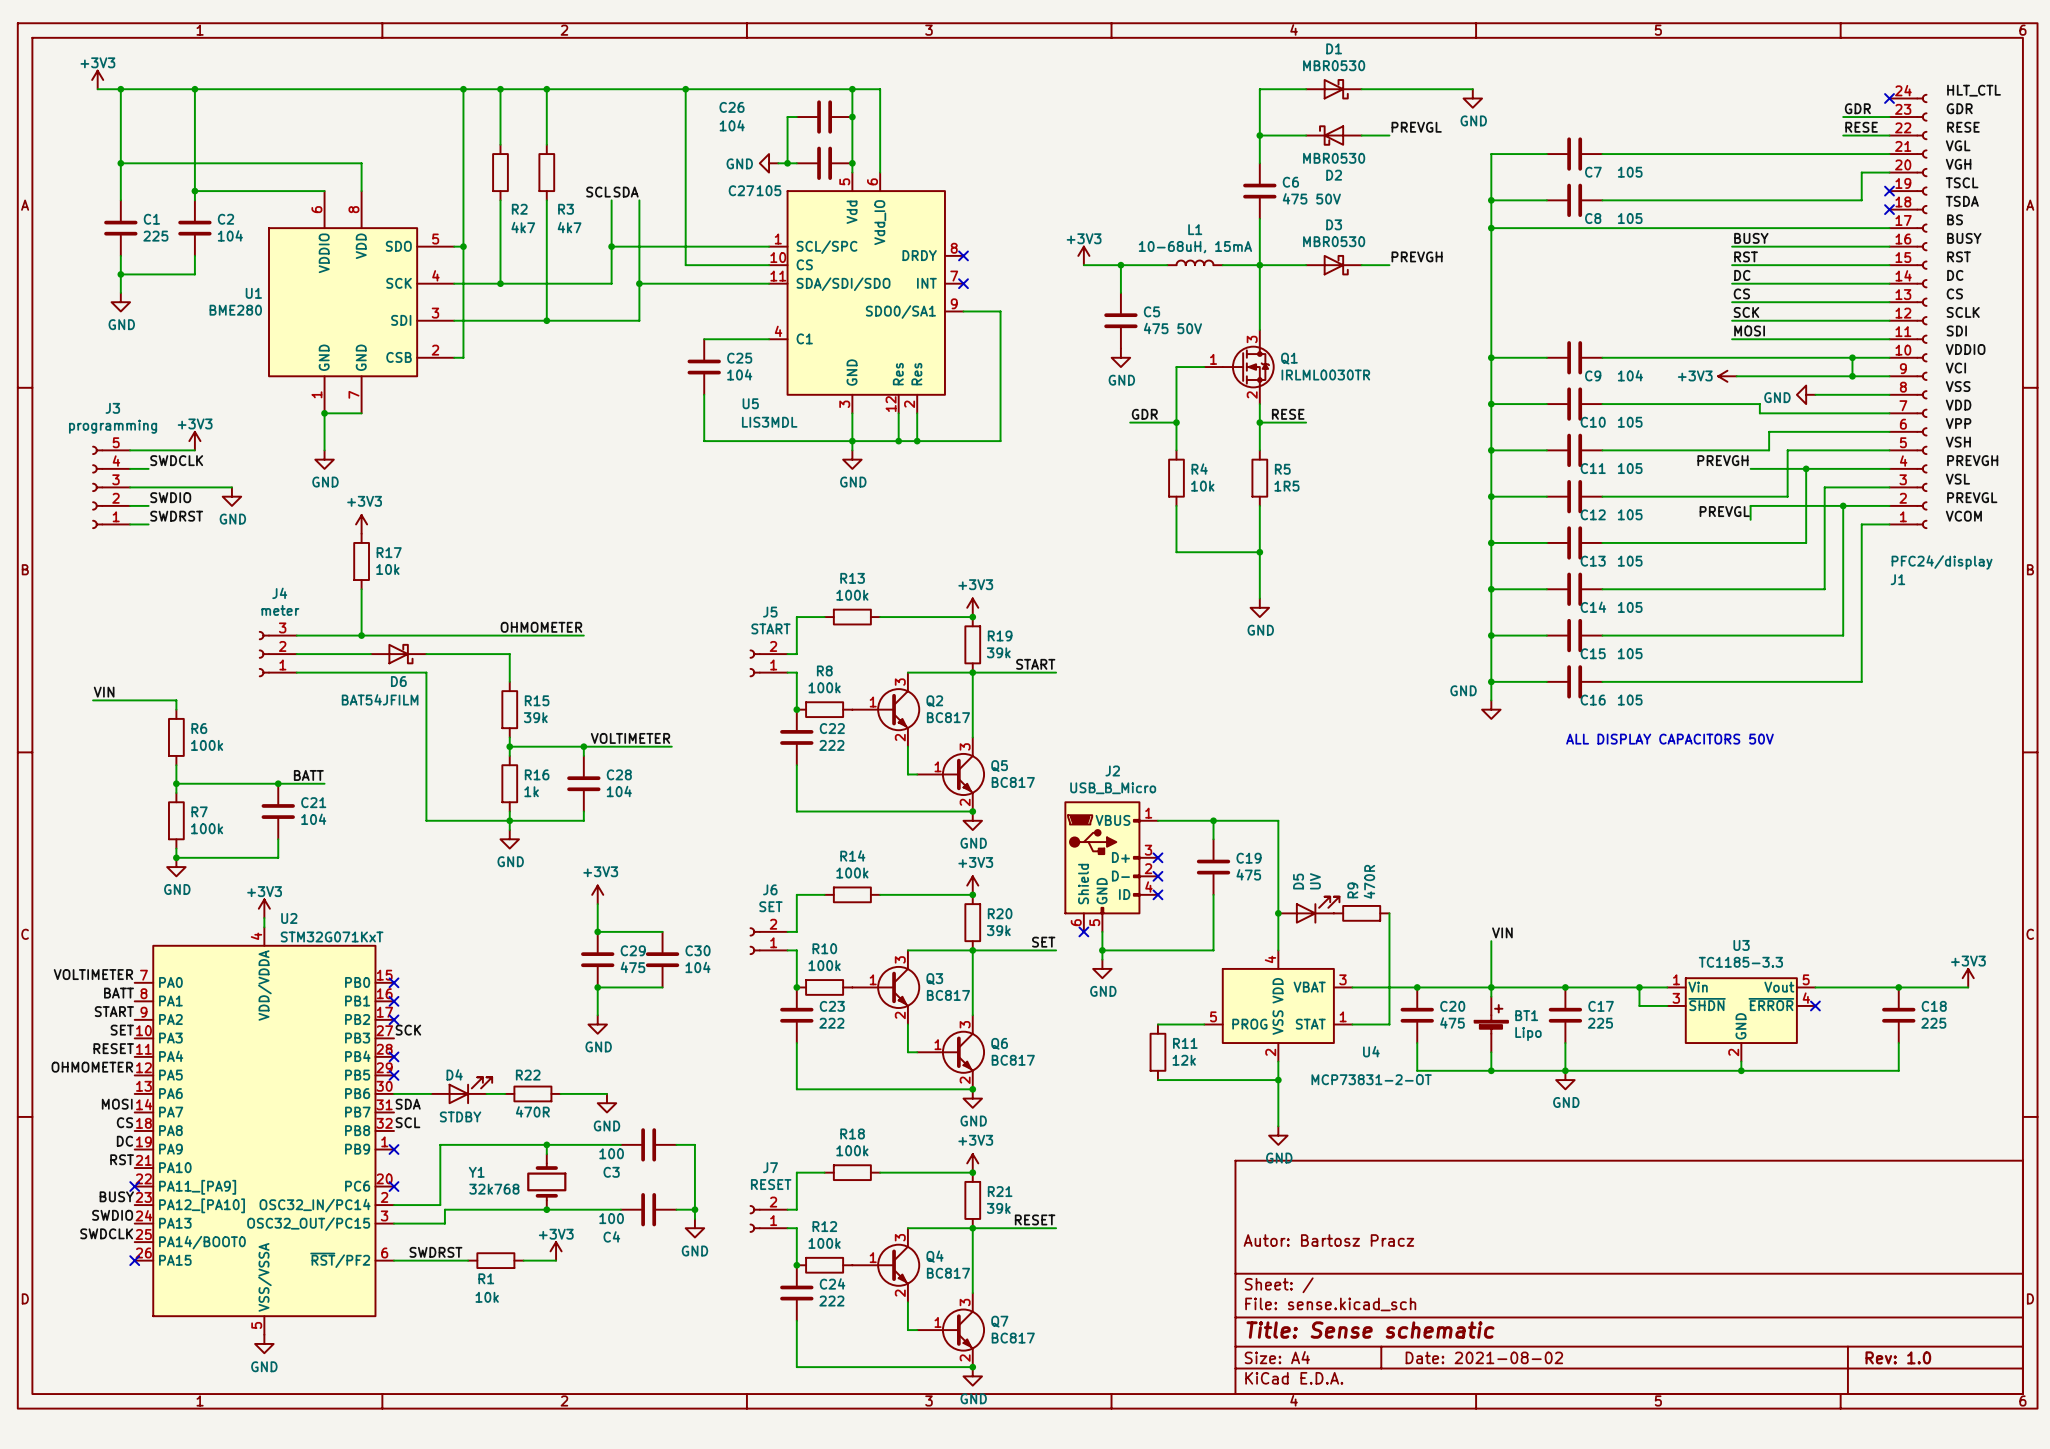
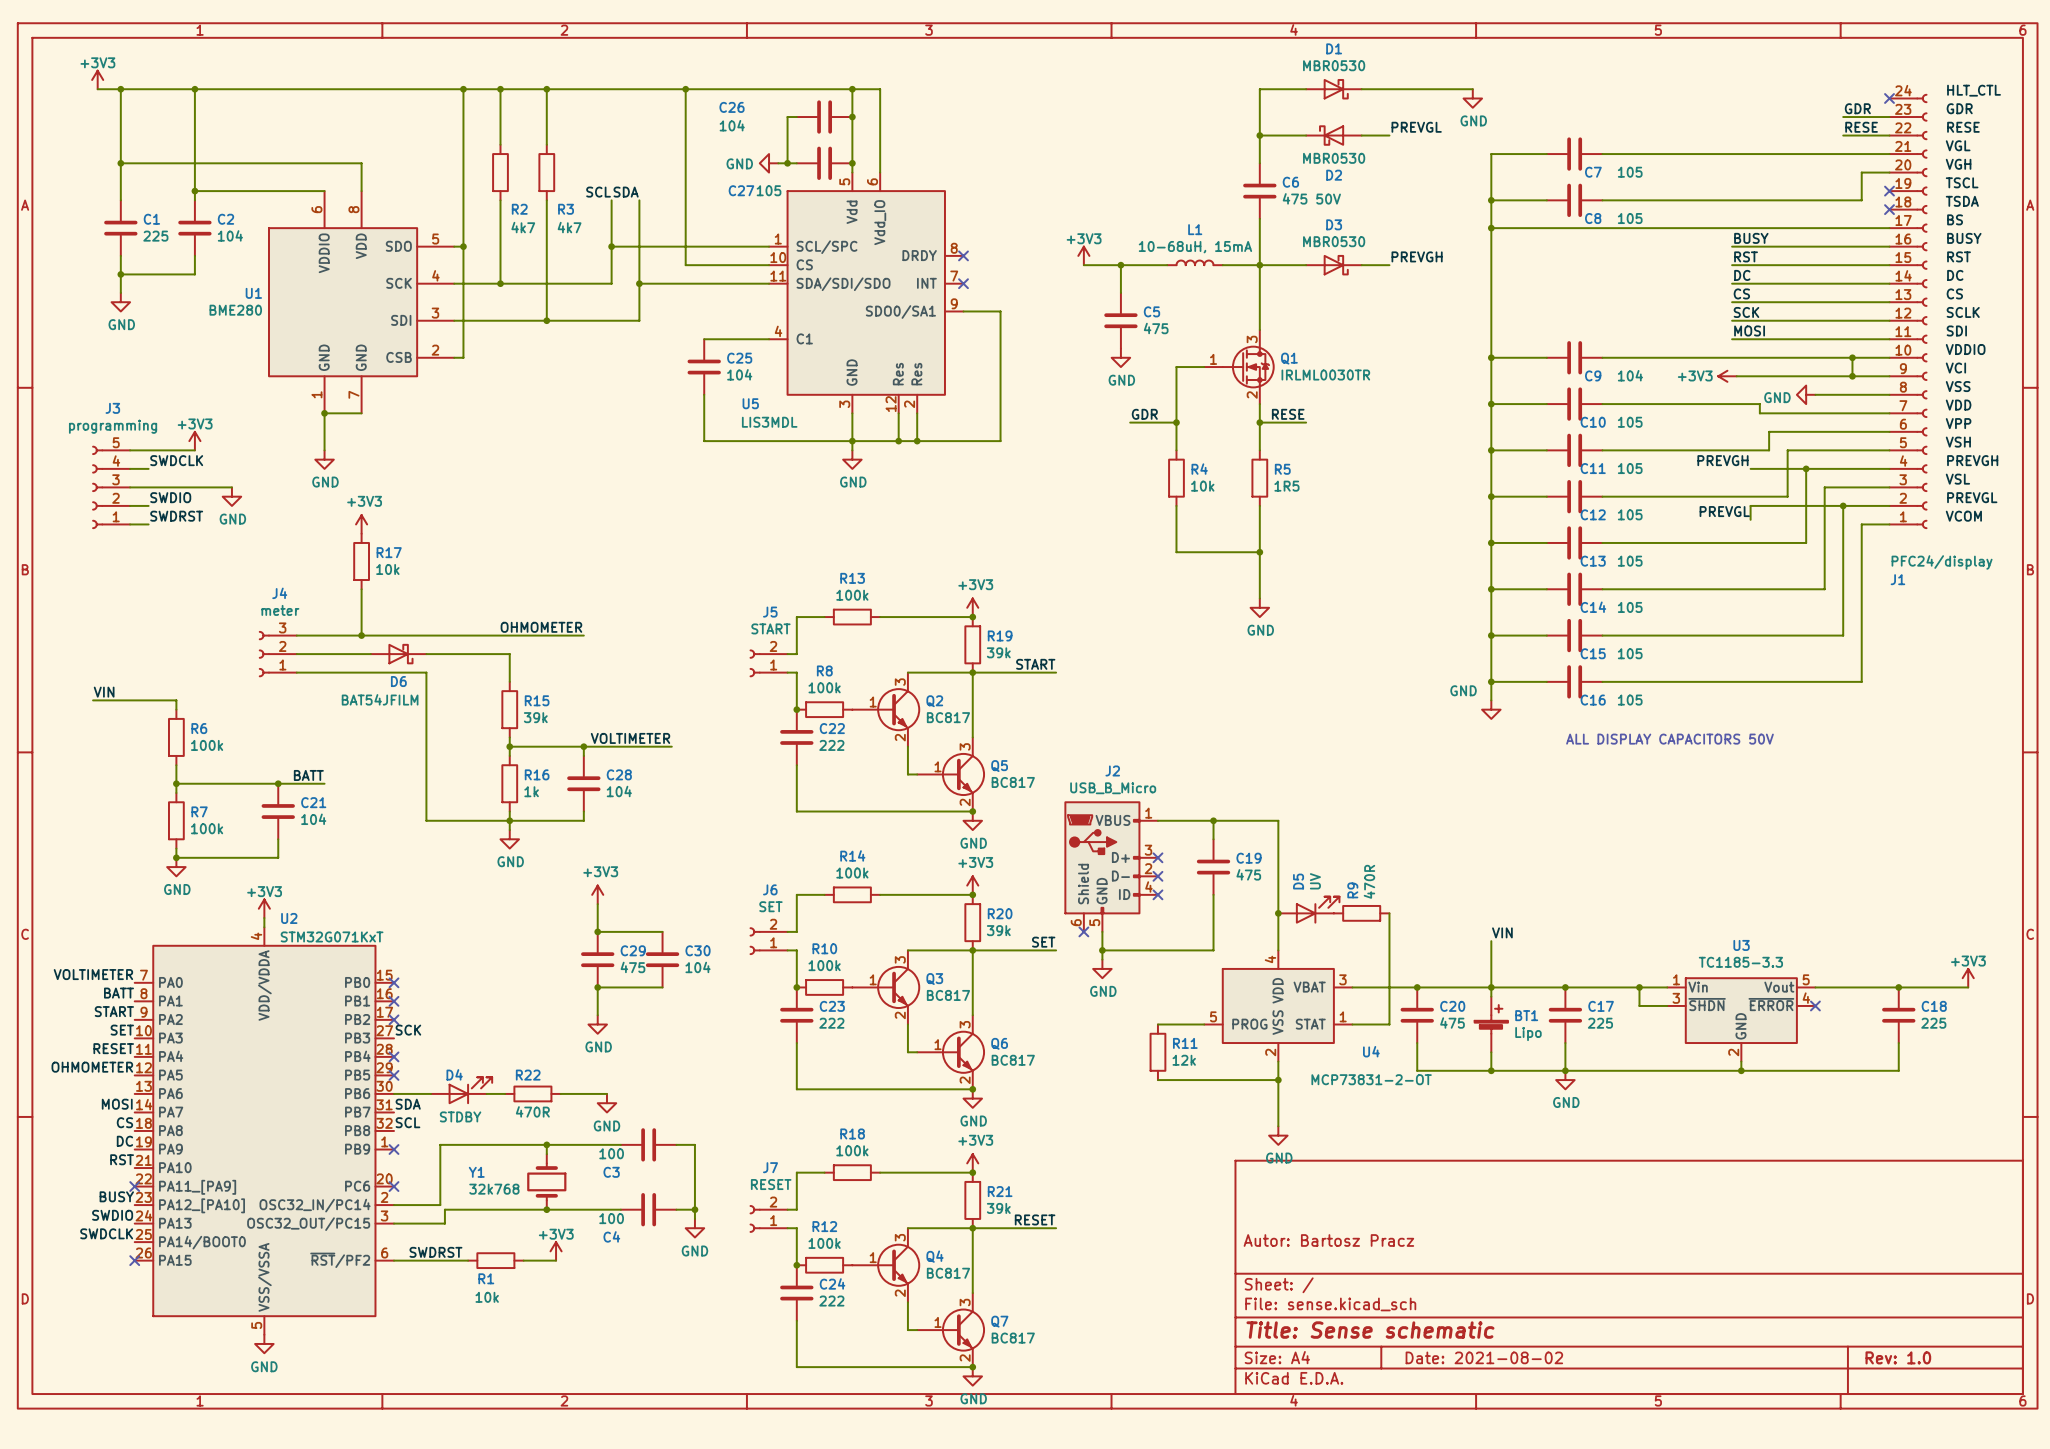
C5 value: 475 50V (1172, 328) -> 475 (1156, 328)

